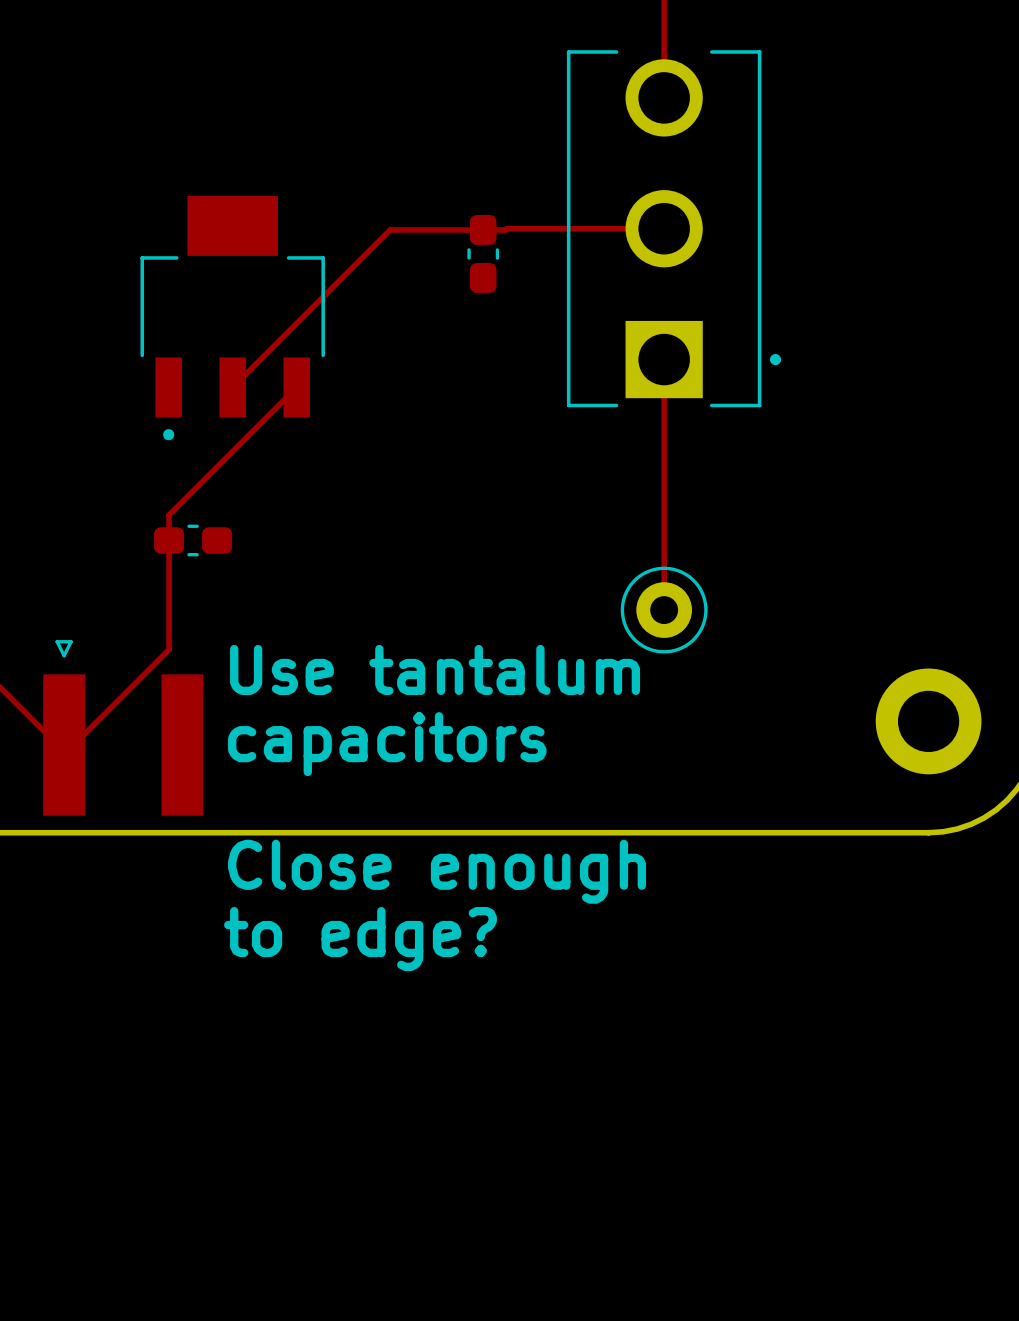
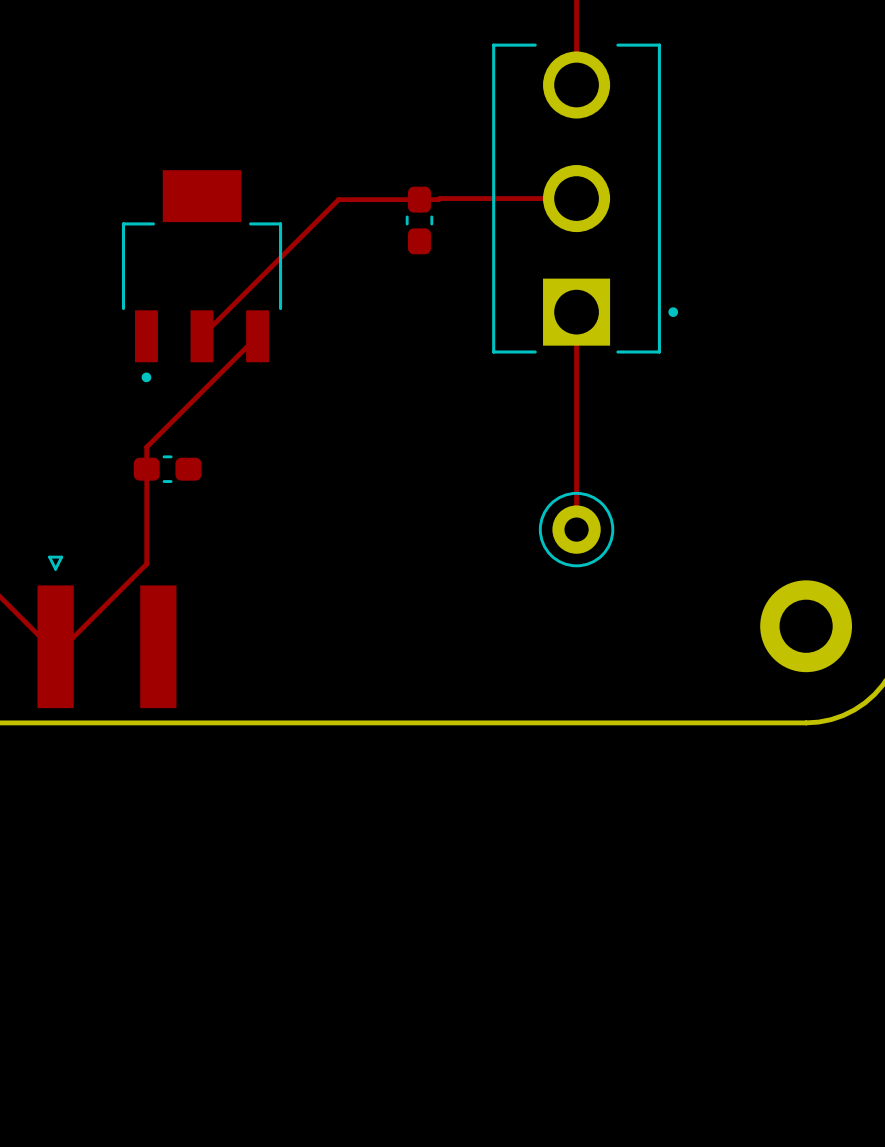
text: Use tantalum (435, 669) -> none
text: capacitors (387, 744) -> none
text: Close enough (437, 871) -> none
text: to edge? (360, 938) -> none

